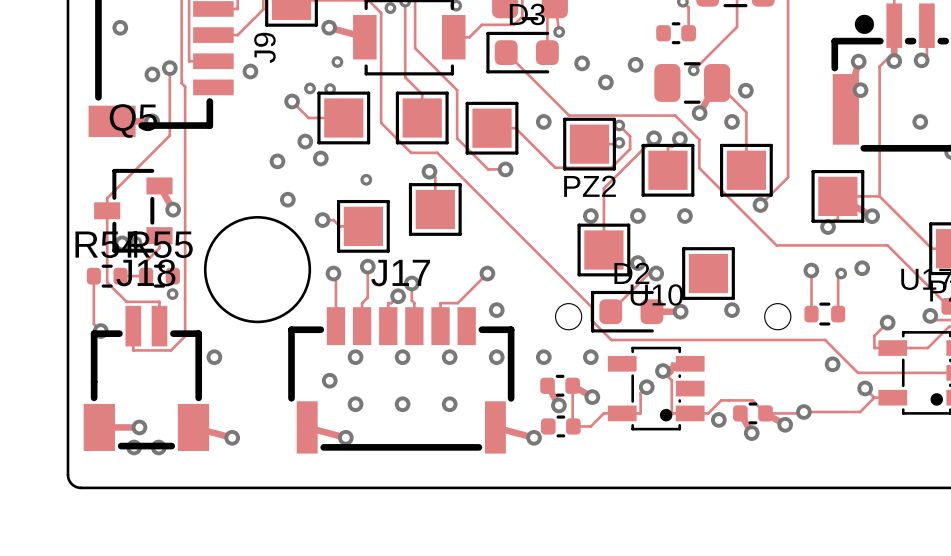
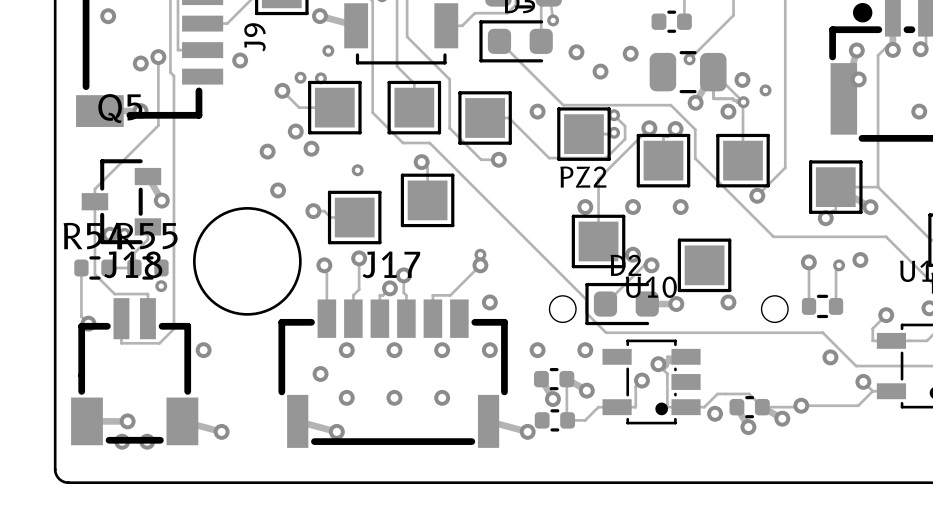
track: none -> (713, 72) (713, 98) (733, 98) (736, 102) (743, 102)
via: none -> (765, 90)
via: none -> (743, 102)
via: none -> (480, 254)

